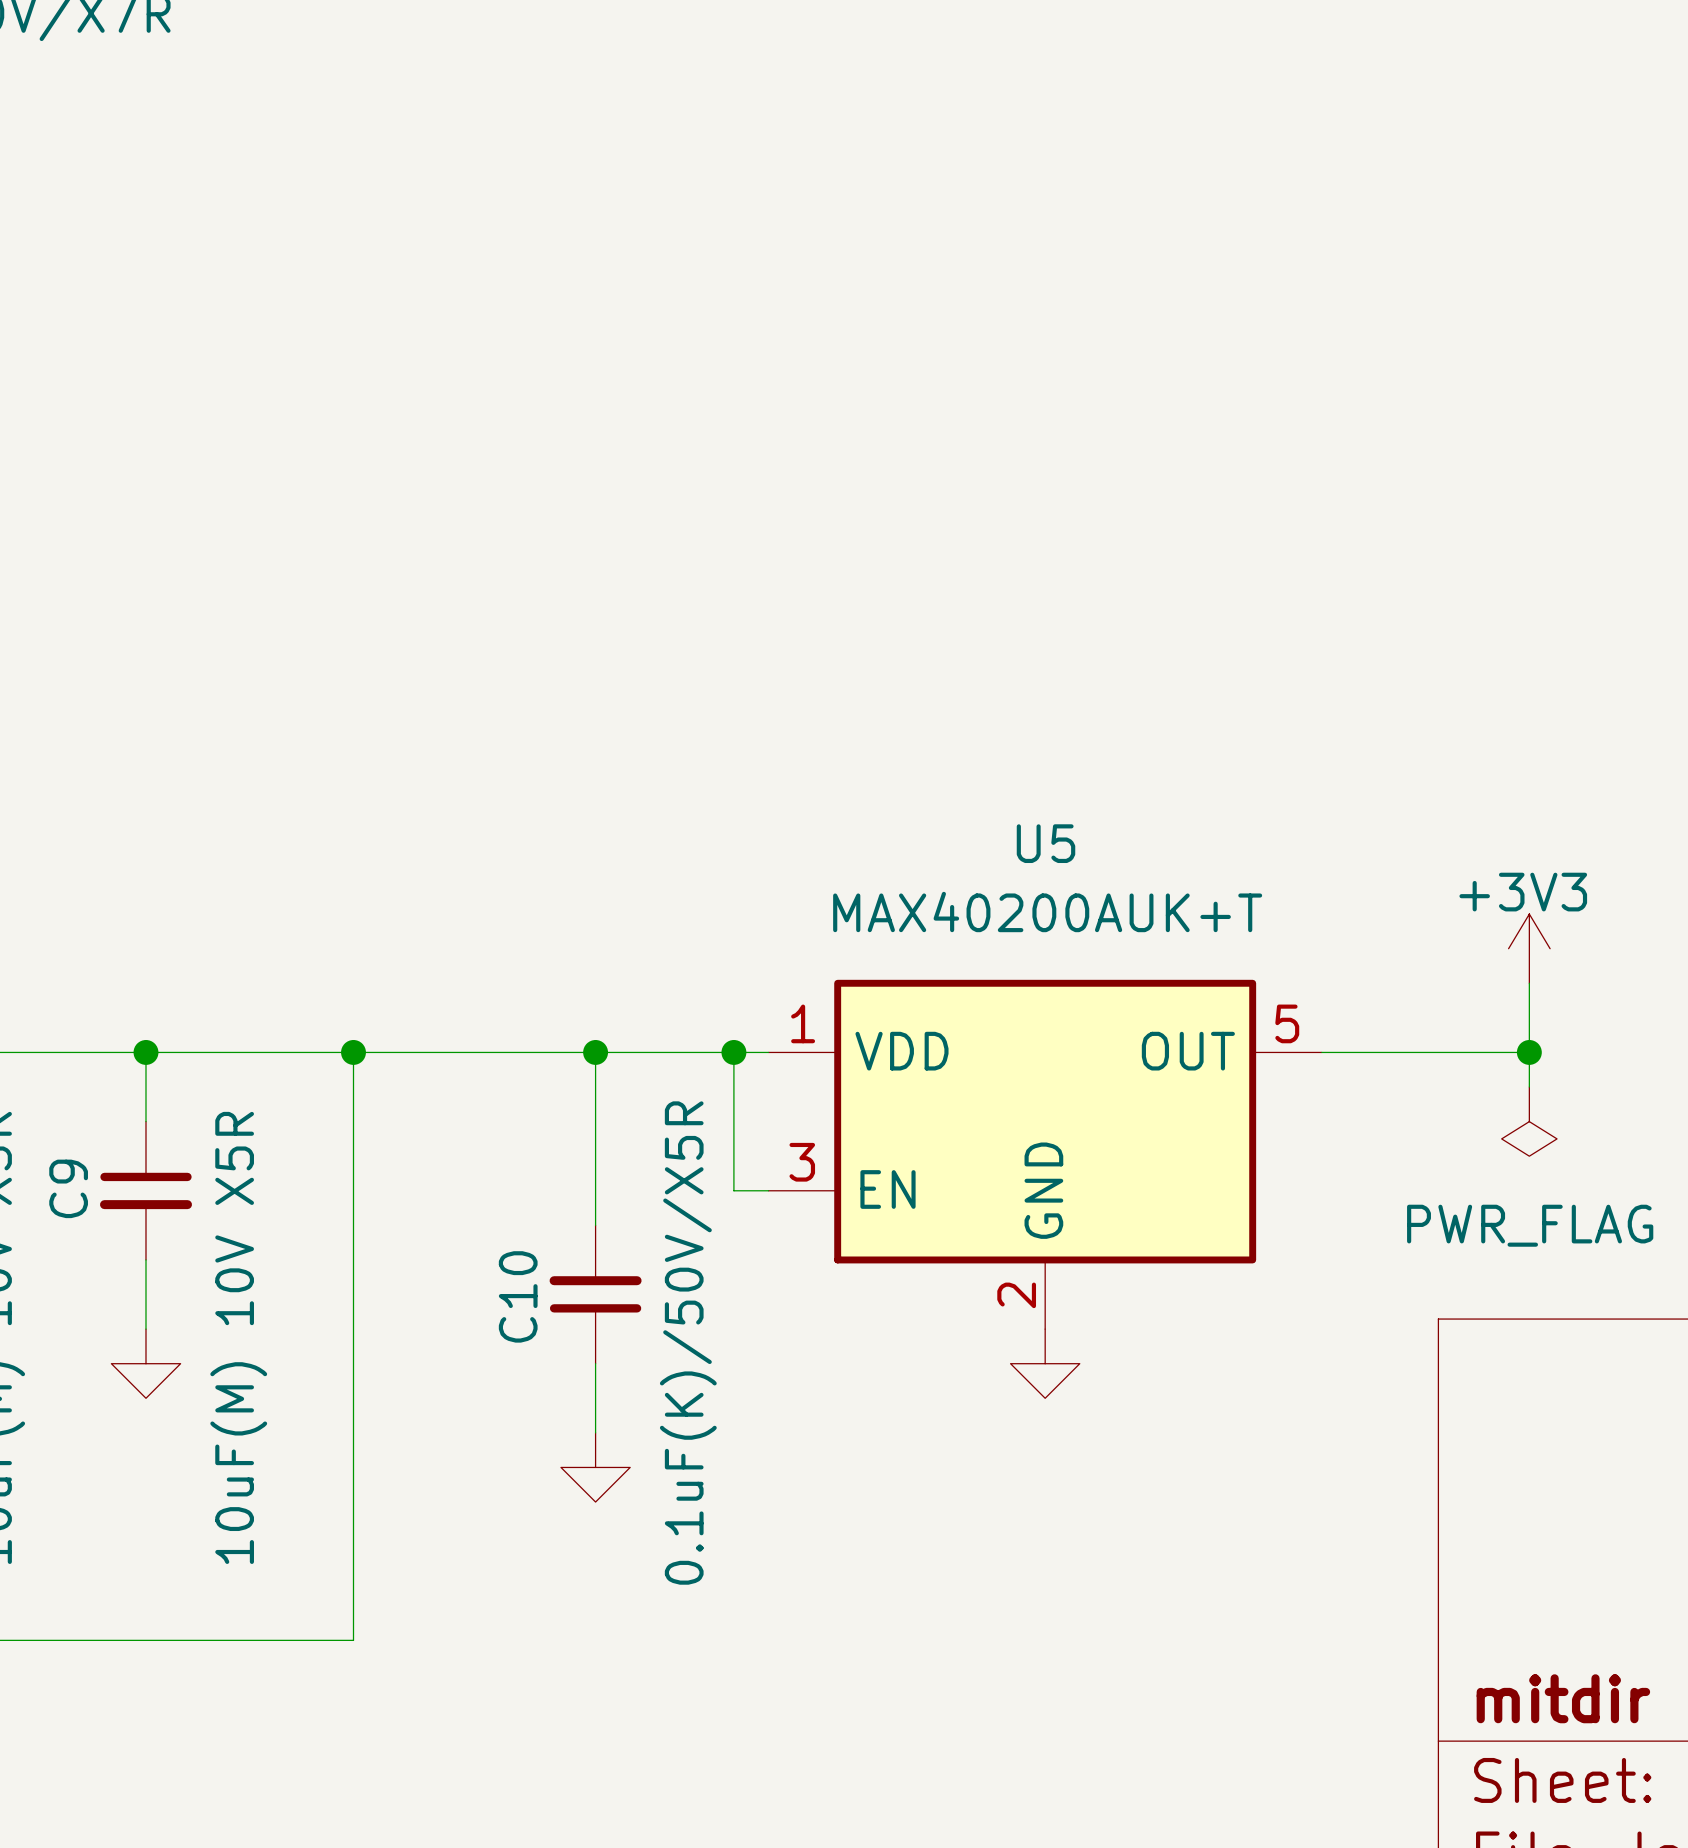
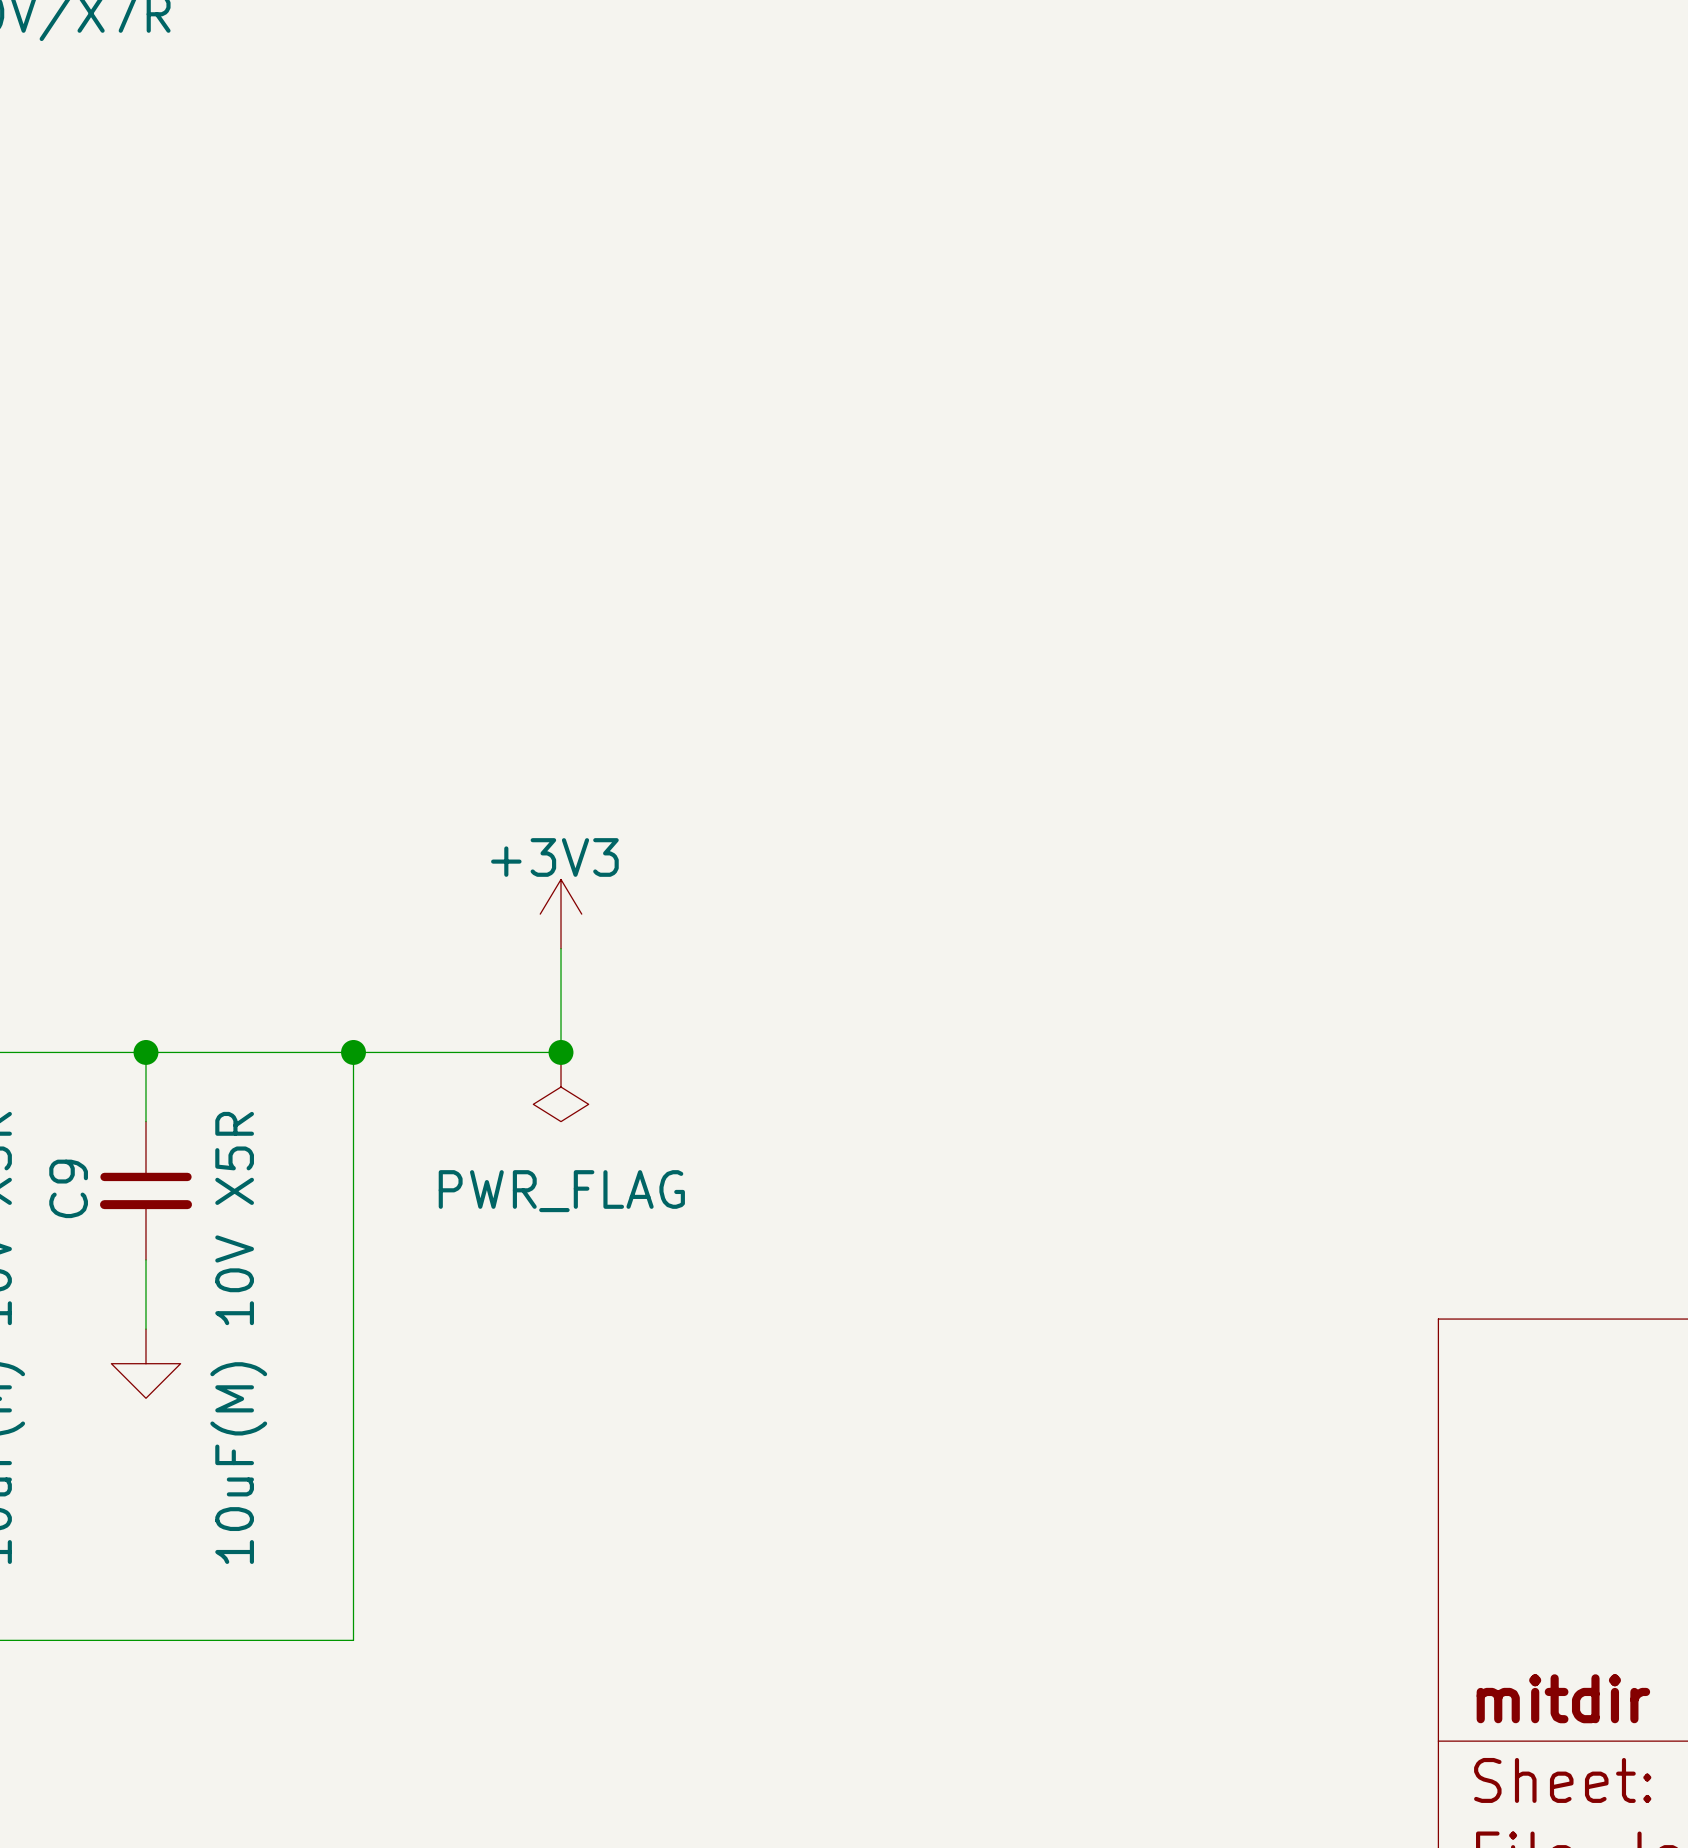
power symbol: none -> +3V3 (561, 914)
power symbol: +3V3 (1529, 948) -> none
wire: (1529, 983) (1529, 1087) -> none
wire: (561, 1052) (768, 1052) -> (561, 1052) (561, 948)
wire: (595, 1052) (595, 1225) -> none
junction position: (595, 1052) -> (561, 1052)
wire: (733, 1052) (733, 1190) (768, 1190) -> none
junction: (733, 1052) -> none
wire: (1321, 1052) (1529, 1052) -> none
junction: (1529, 1052) -> none
power symbol: none -> PWR_FLAG (561, 1087)
power symbol: PWR_FLAG (1529, 1121) -> none
U5: MAX40200AUK+T (1045, 1154) -> none
C10: 0.1uF(K)/50V/X5R (595, 1294) -> none
wire: (595, 1363) (595, 1432) -> none
power symbol: (1045, 1363) -> none
power symbol: (595, 1467) -> none

